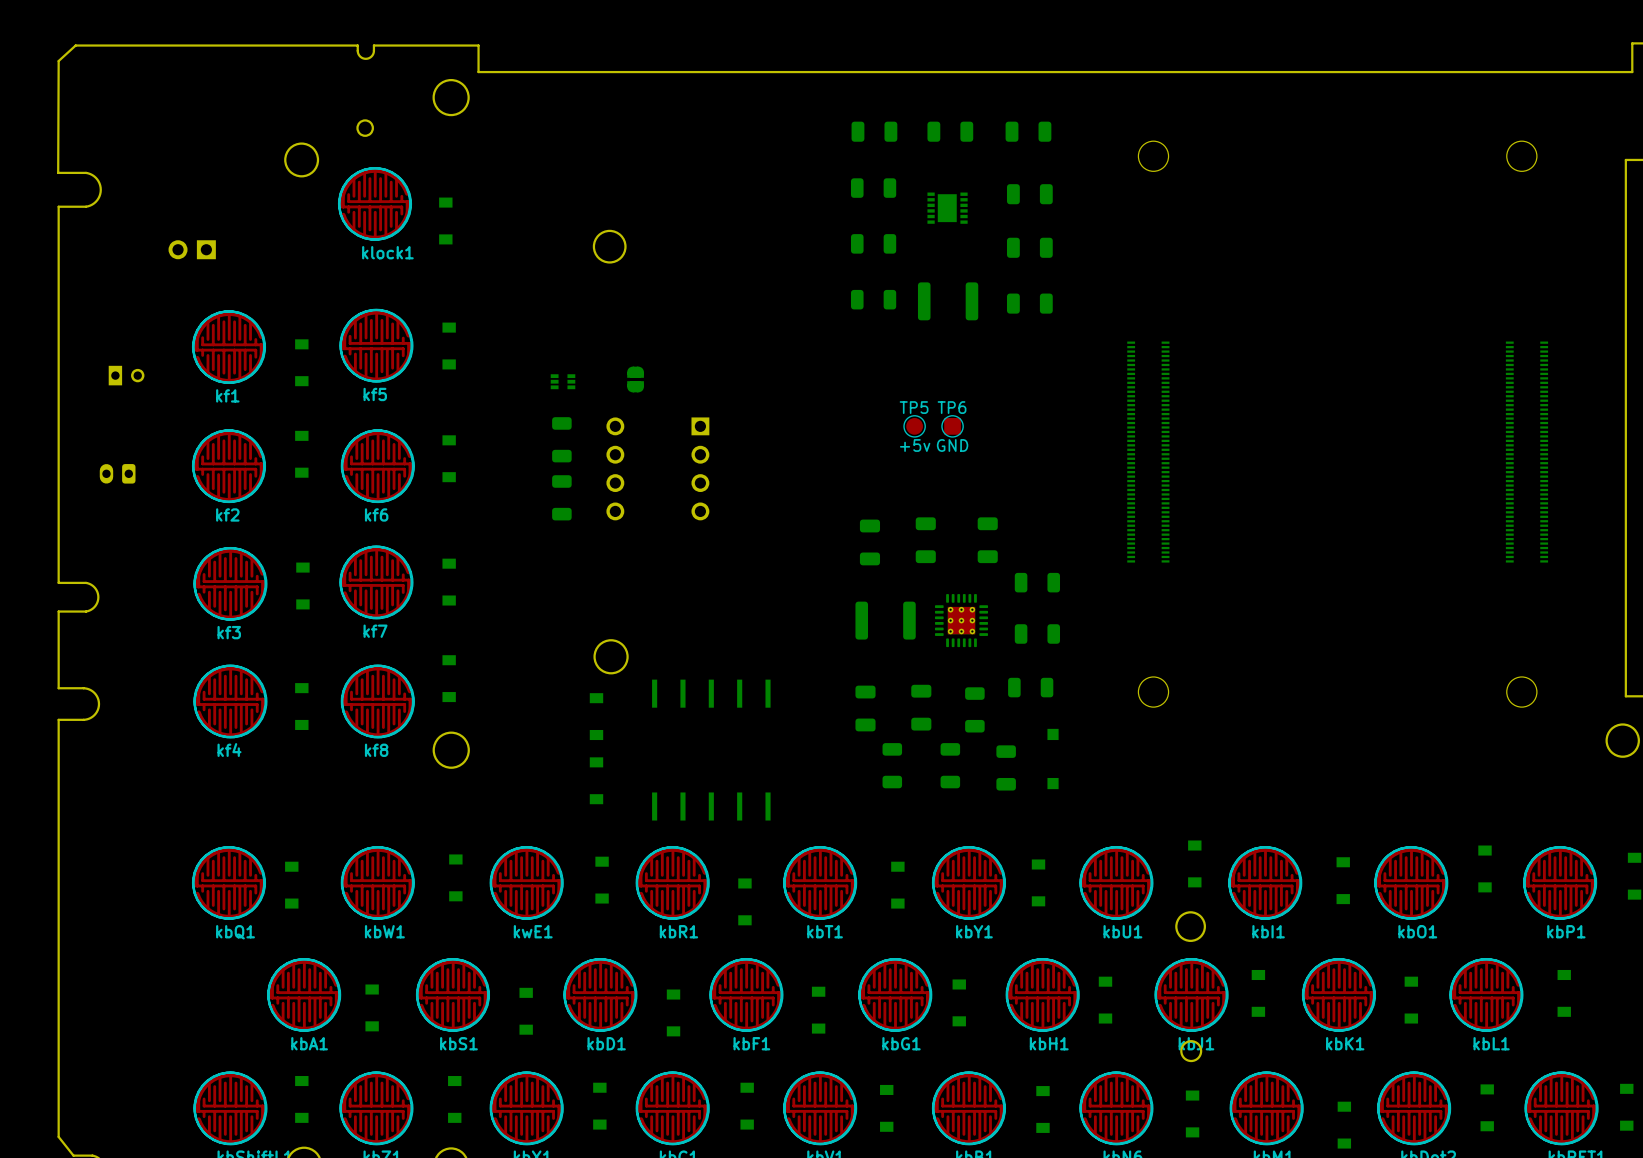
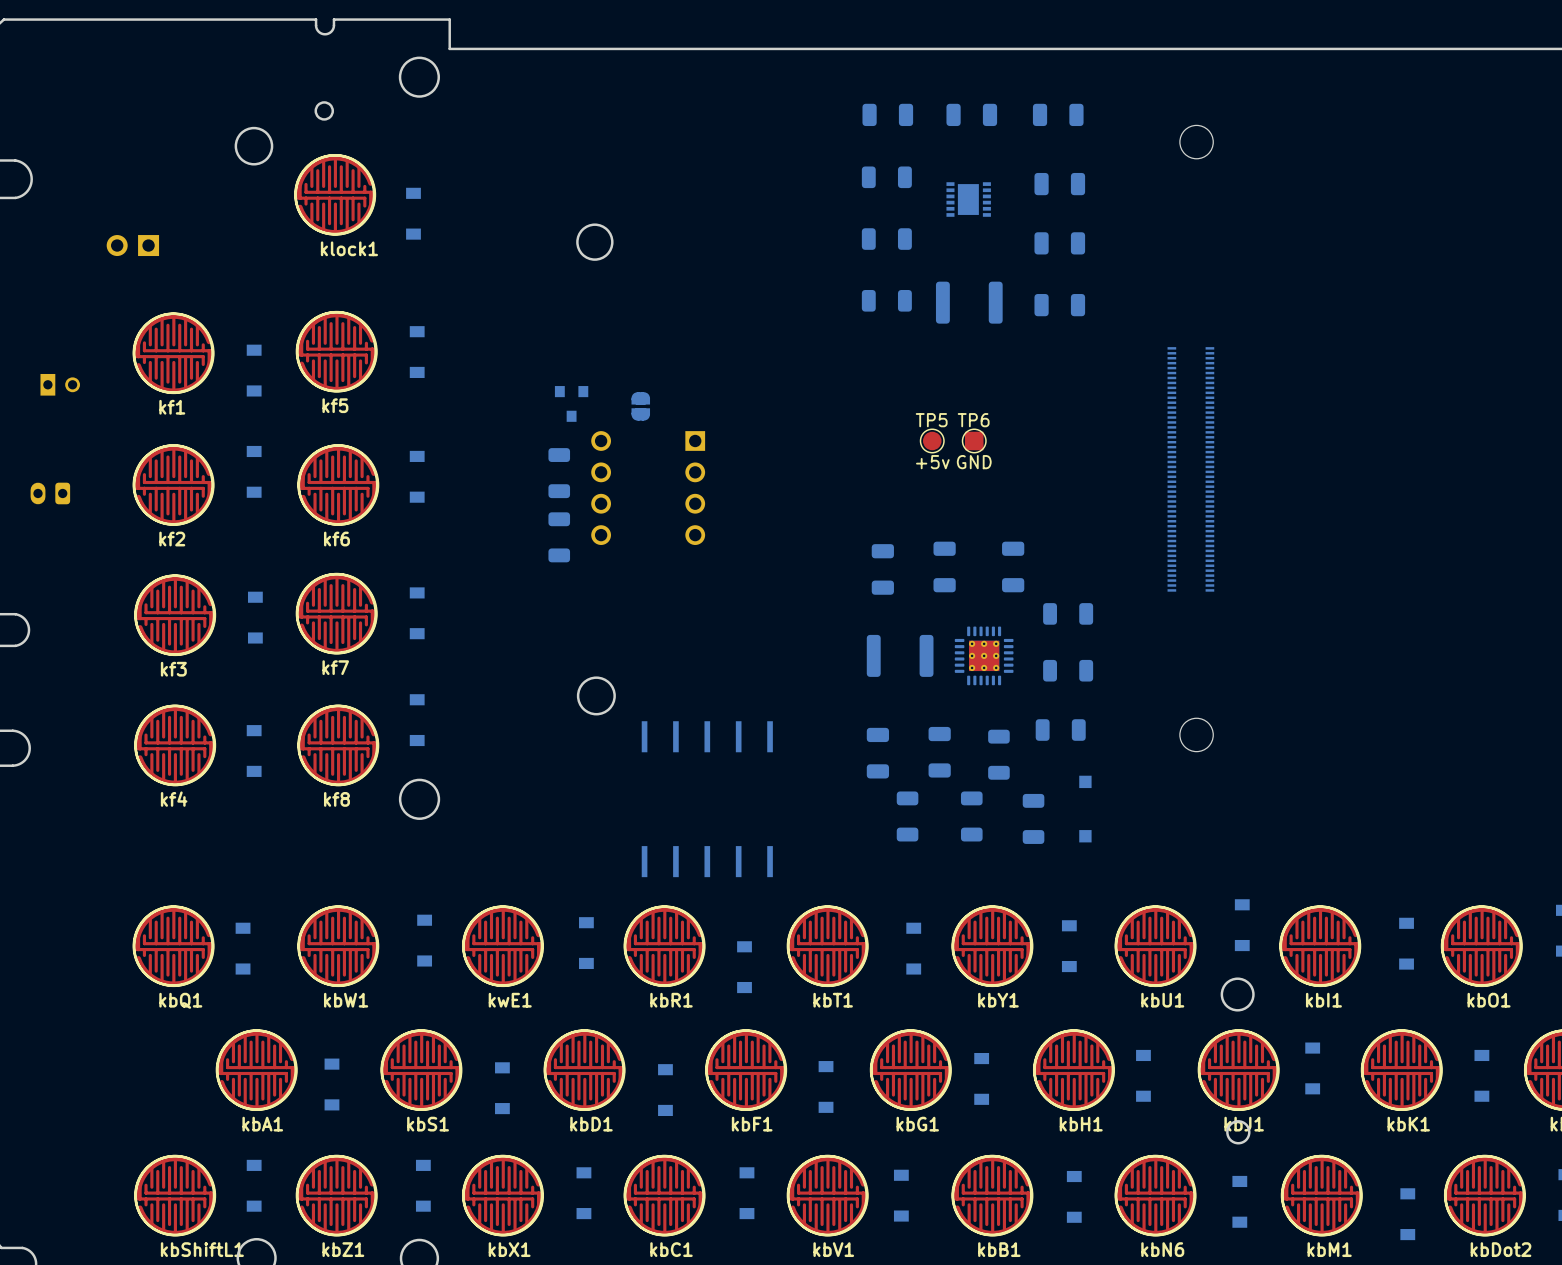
part position: (635, 379) -> (640, 406)
part: (563, 381) -> none
part: none -> (571, 403)
part position: (561, 439) -> (559, 473)
part position: (561, 497) -> (559, 537)
part: (596, 716) -> none
part: (596, 780) -> none

